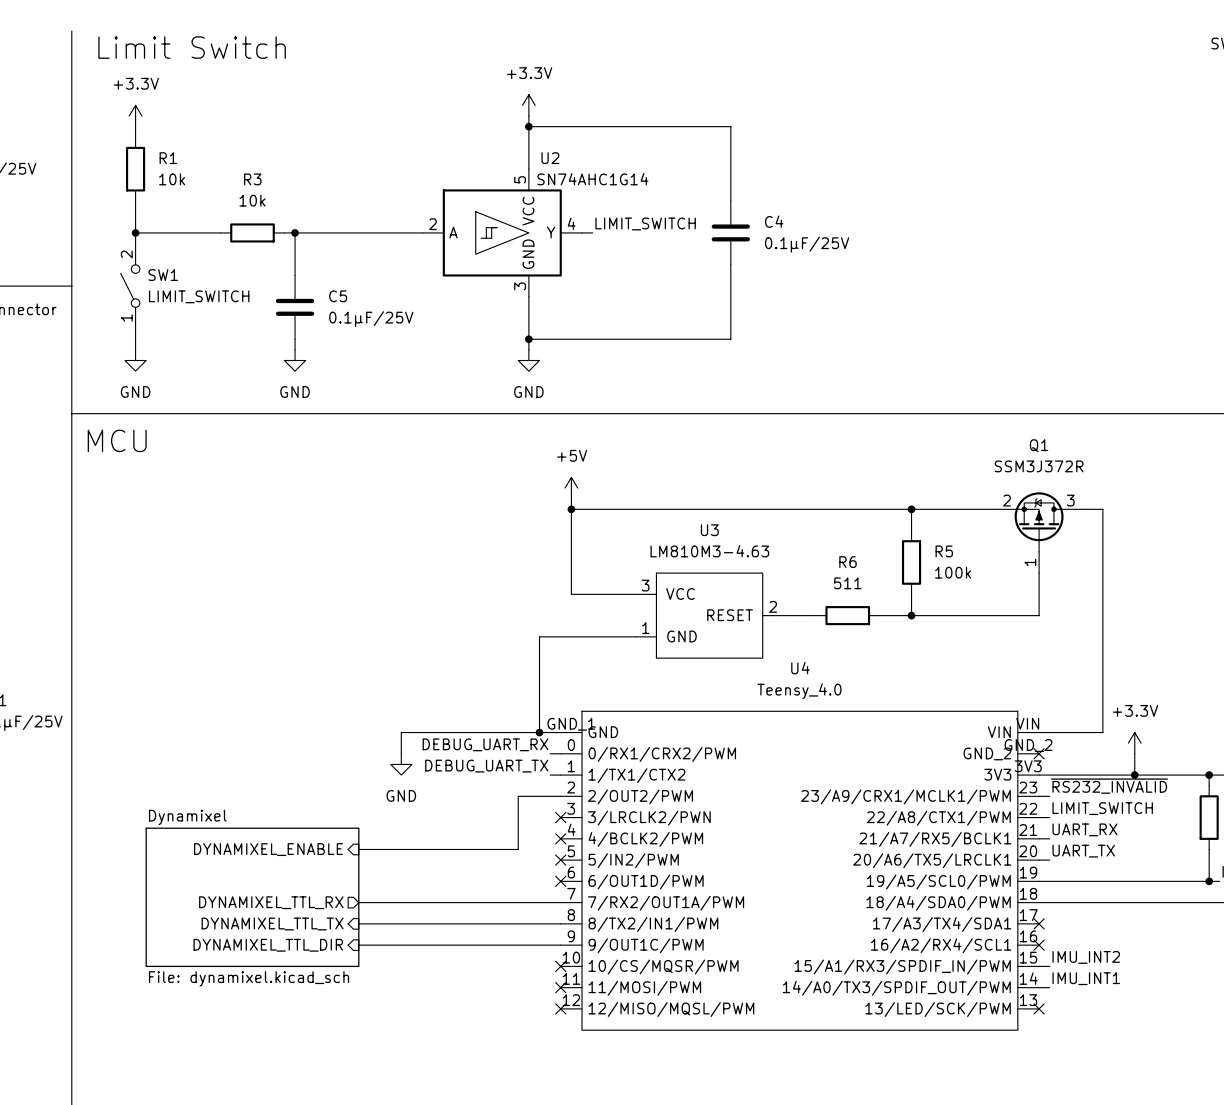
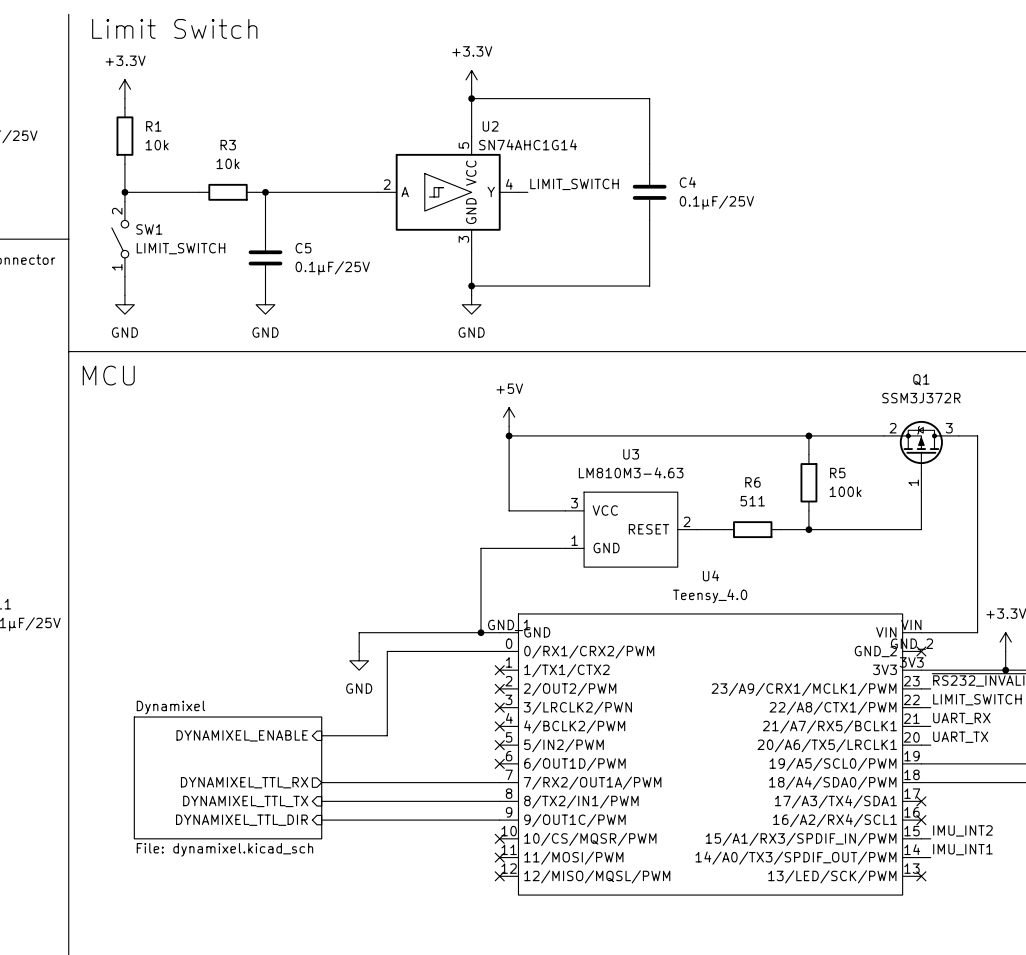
label: DEBUG_UART_RX (485, 744) -> none
label: DEBUG_UART_TX (486, 766) -> none
wire: (550, 775) (560, 775) -> none
no-connect mark: none -> (499, 670)
wire: (560, 796) (518, 796) (518, 849) (433, 849) -> (490, 651) (387, 651) (387, 735)
no-connect mark: none -> (499, 688)

